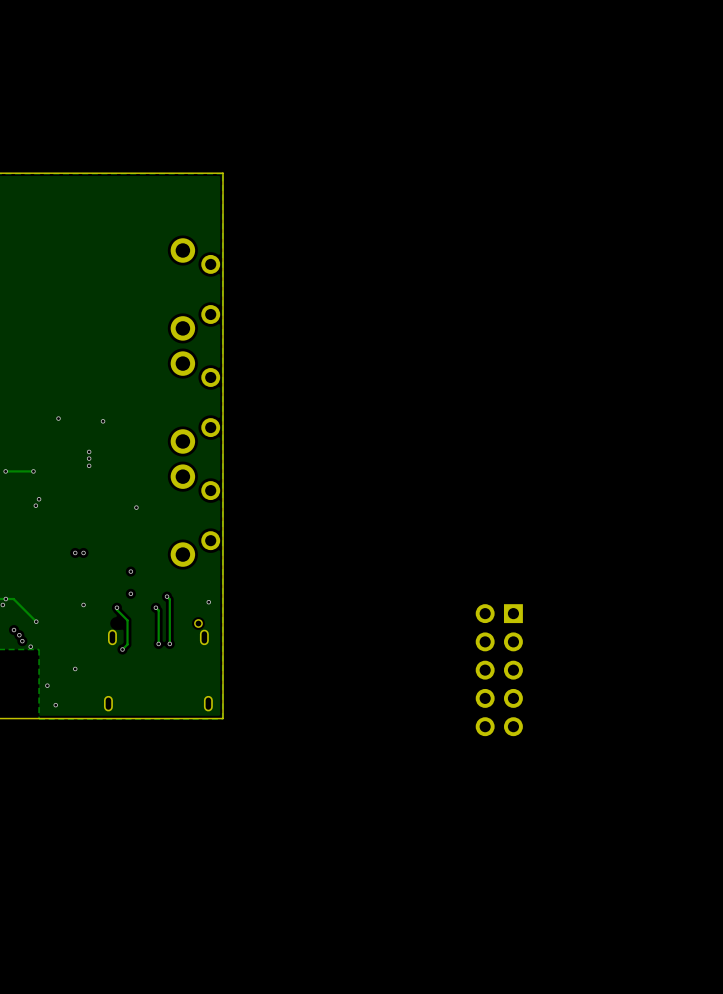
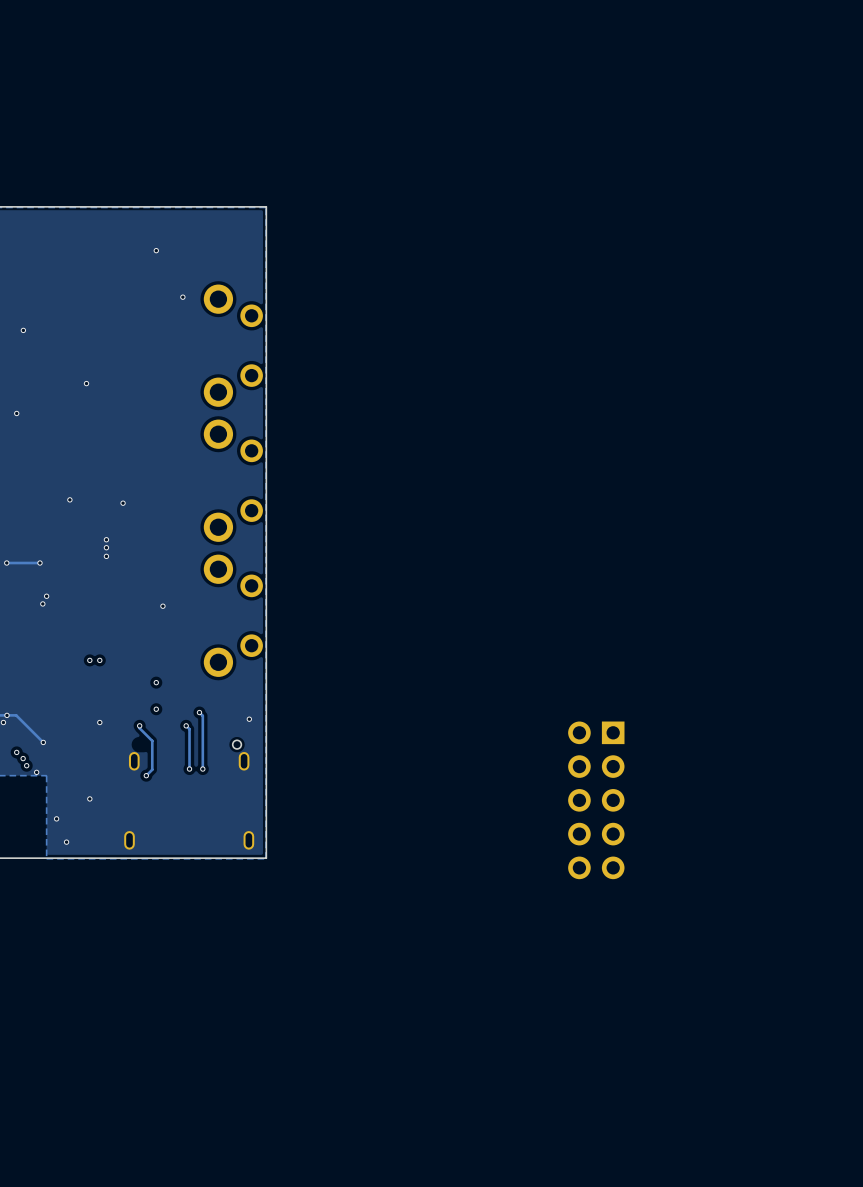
via: none -> (156, 250)
via: none -> (182, 297)
via: none -> (23, 330)
via: none -> (86, 383)
via: none -> (16, 413)

